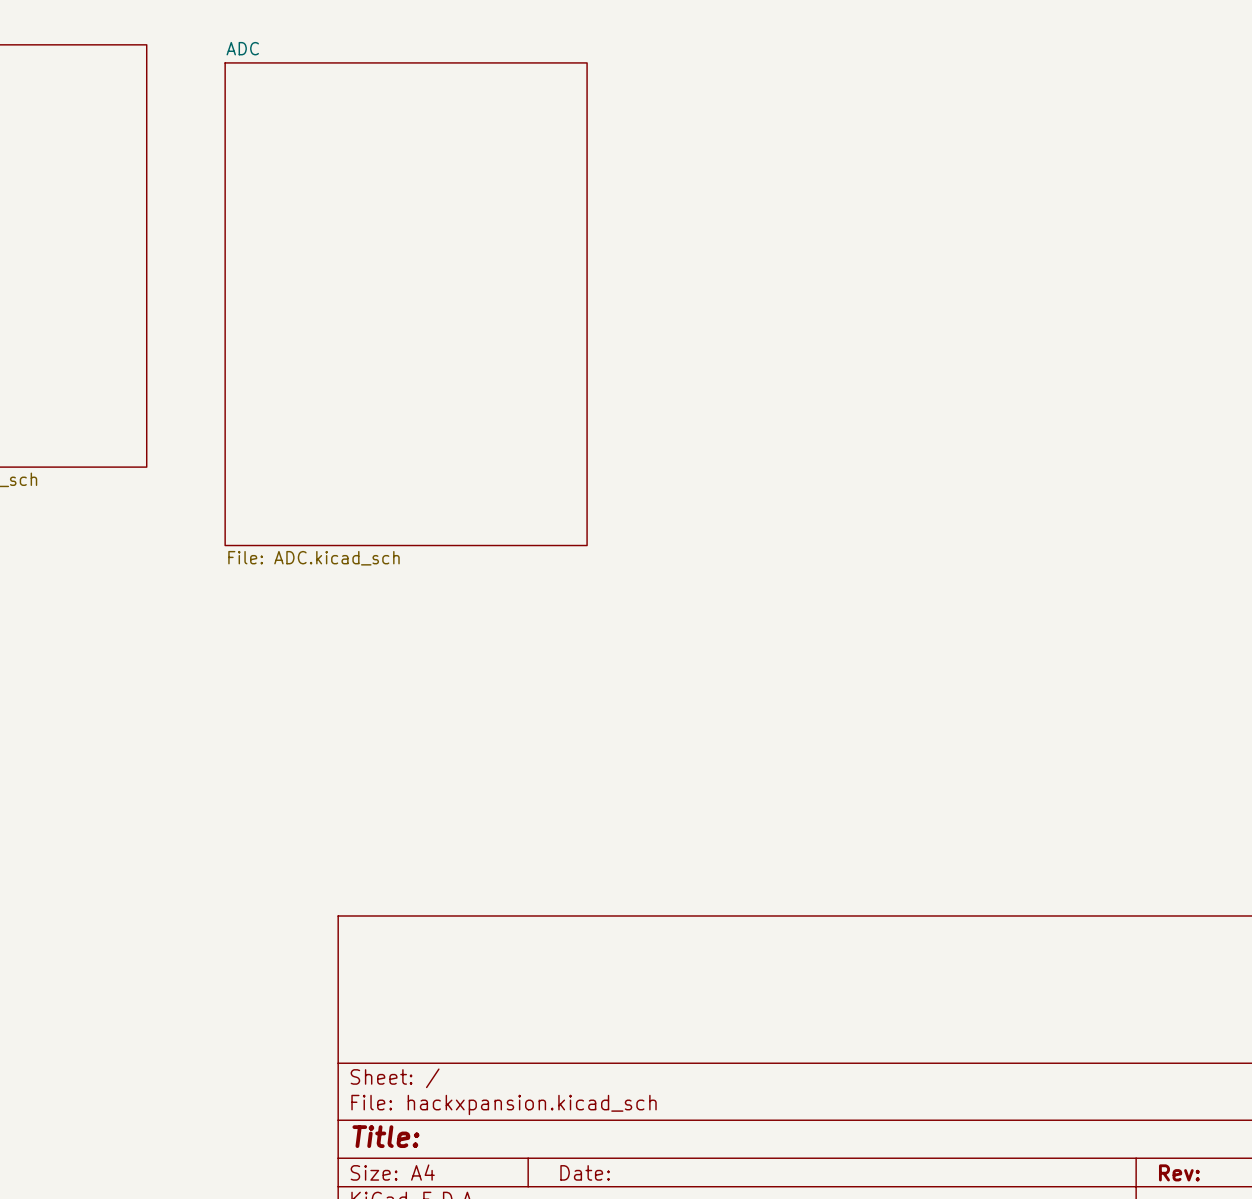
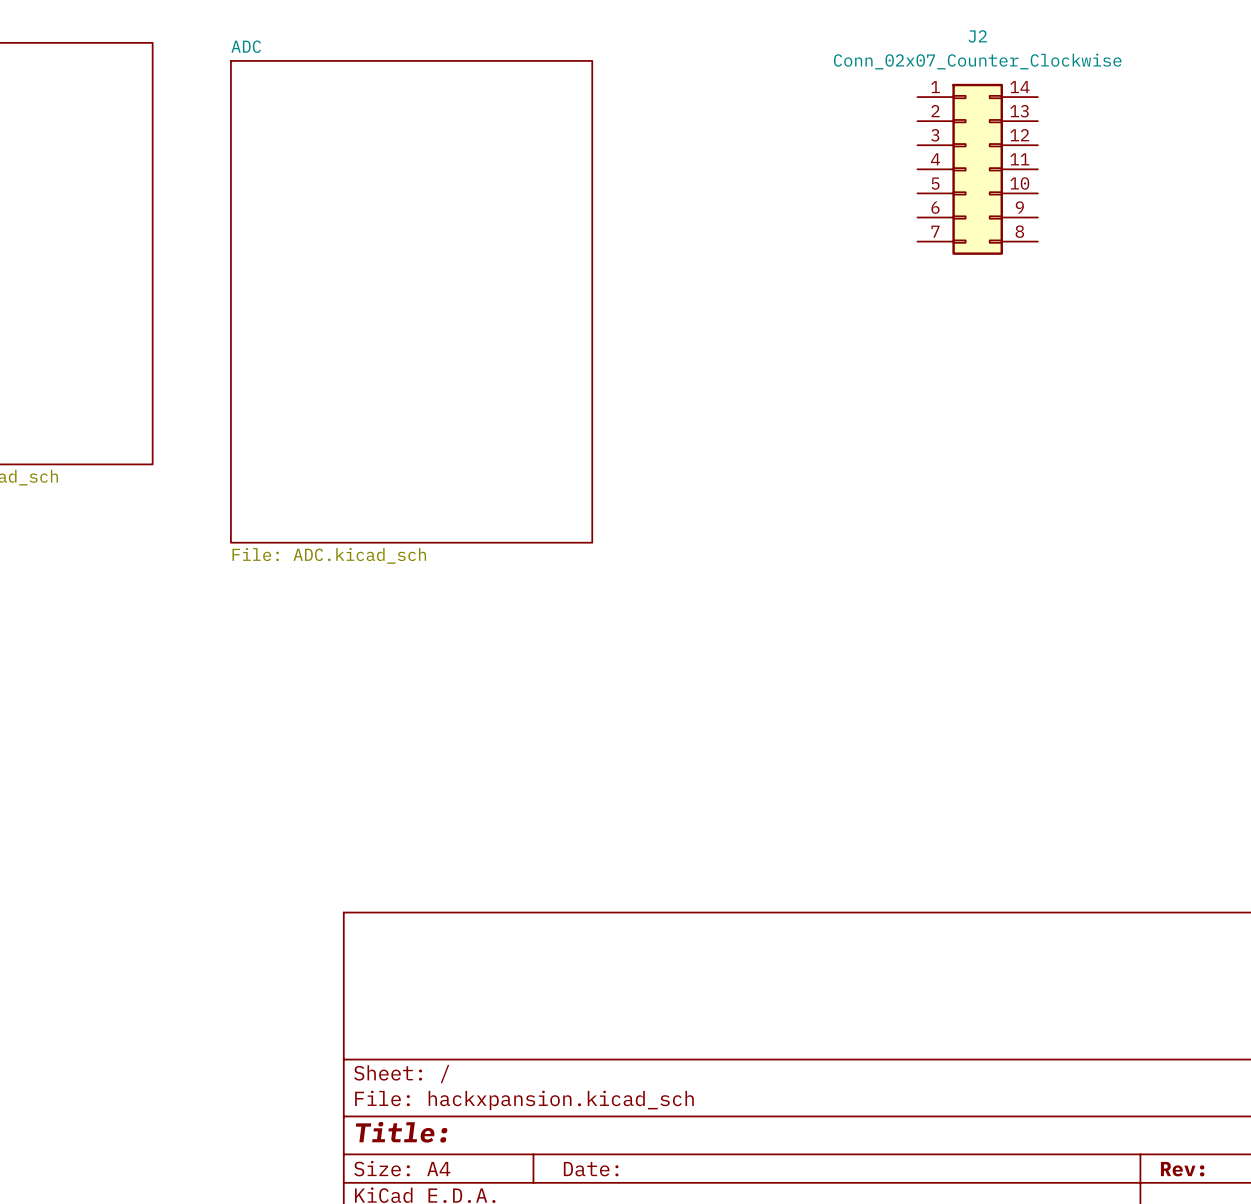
J2: none -> Conn_02x07_Counter_Clockwise (977, 169)

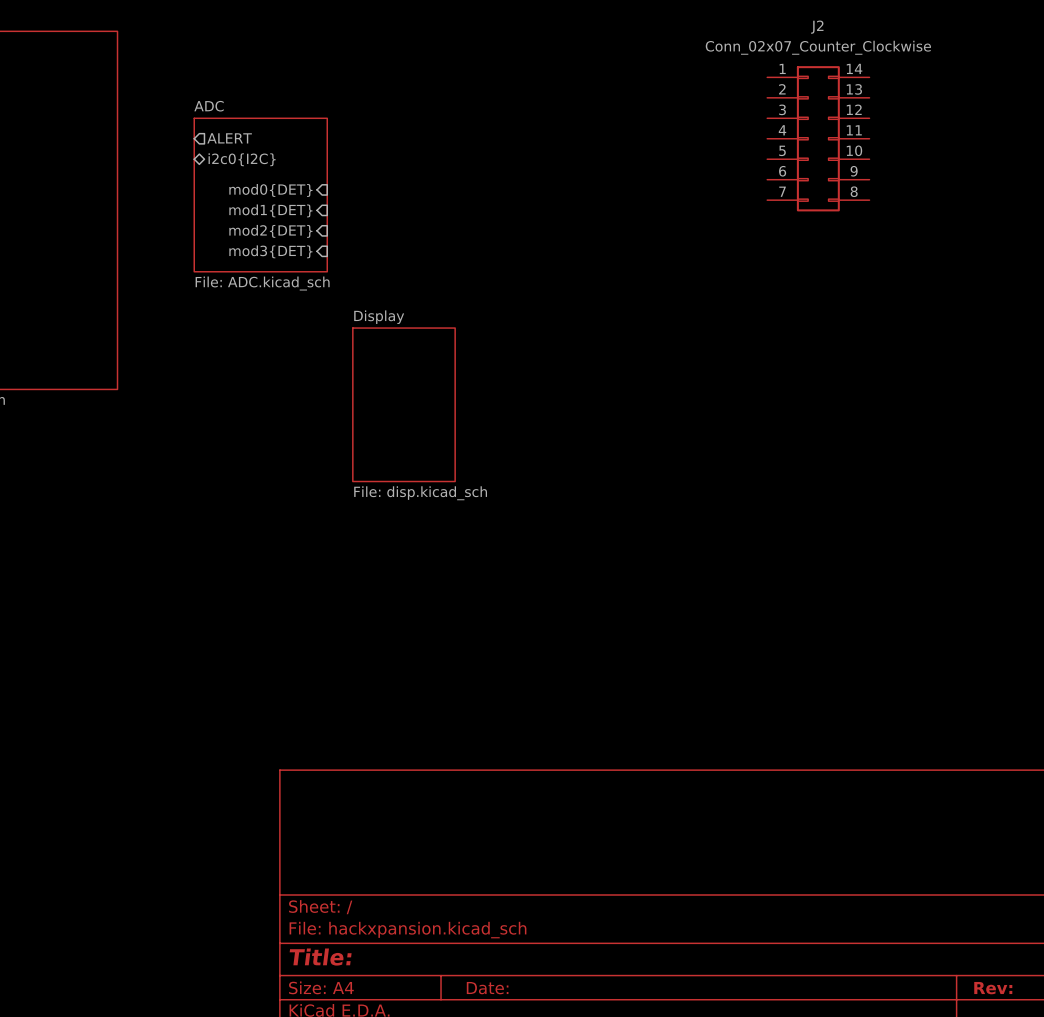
sheet pin: none -> ALERT (229, 138)
sheet pin: none -> i2c0{I2C} (242, 159)
sheet pin: none -> mod0{DET} (270, 190)
sheet ADC: none -> File: ADC.kicad_sch (260, 195)
sheet pin: none -> mod1{DET} (270, 210)
sheet pin: none -> mod2{DET} (270, 231)
sheet ADC: File: ADC.kicad_sch (411, 301) -> none
sheet pin: none -> mod3{DET} (270, 251)
sheet Display: none -> File: disp.kicad_sch (403, 404)

